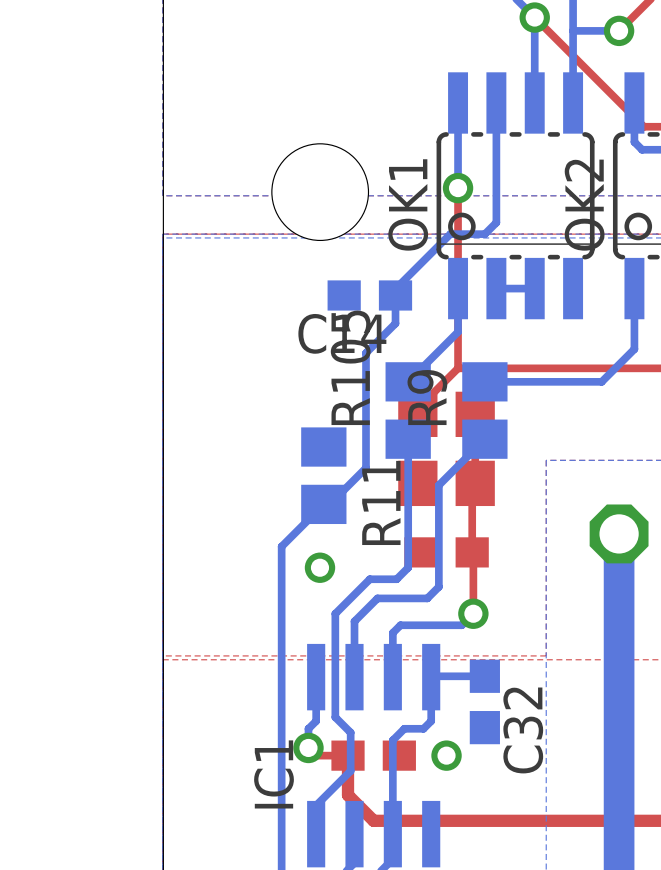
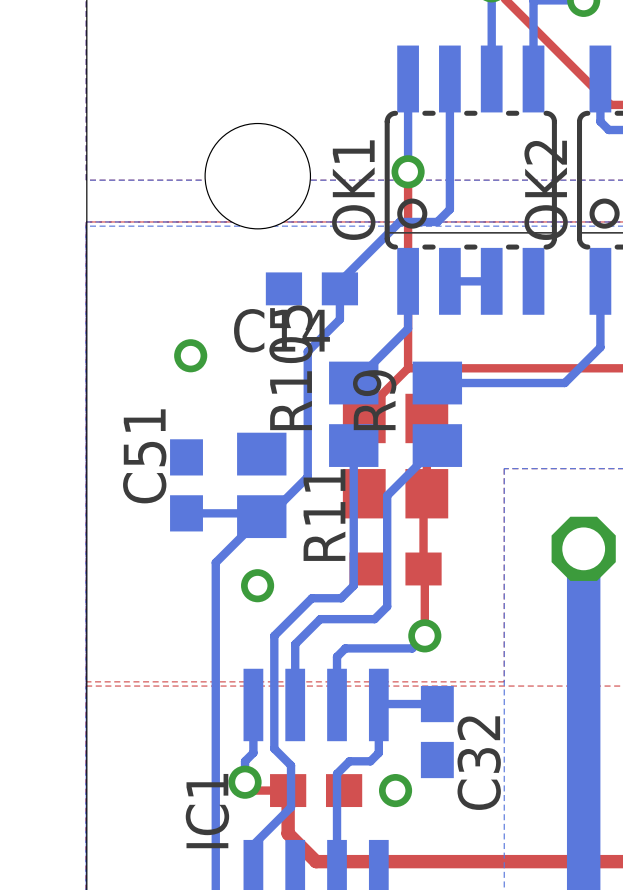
via: none -> (190, 355)
C51: none -> (186, 485)
bottom track: none -> (186, 513) (261, 513) (261, 516)

